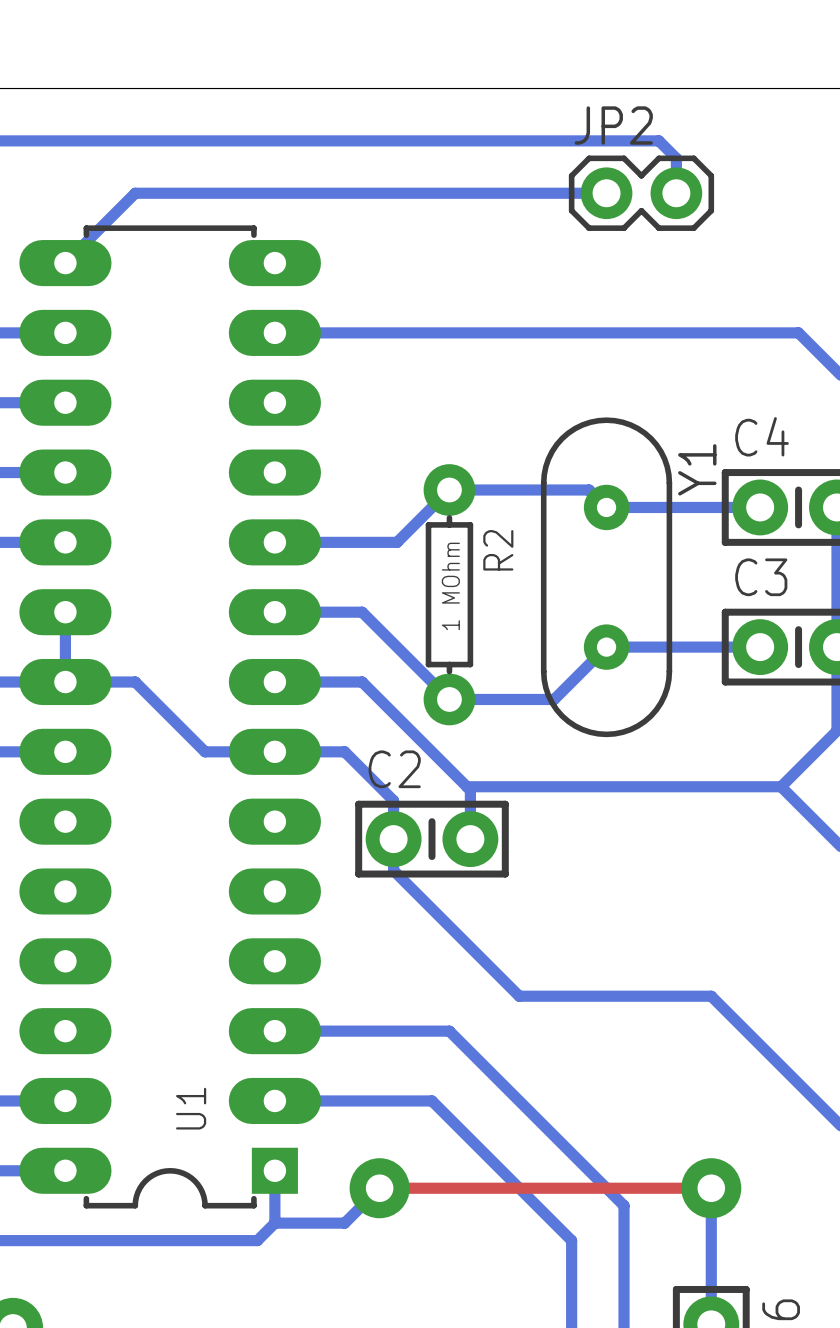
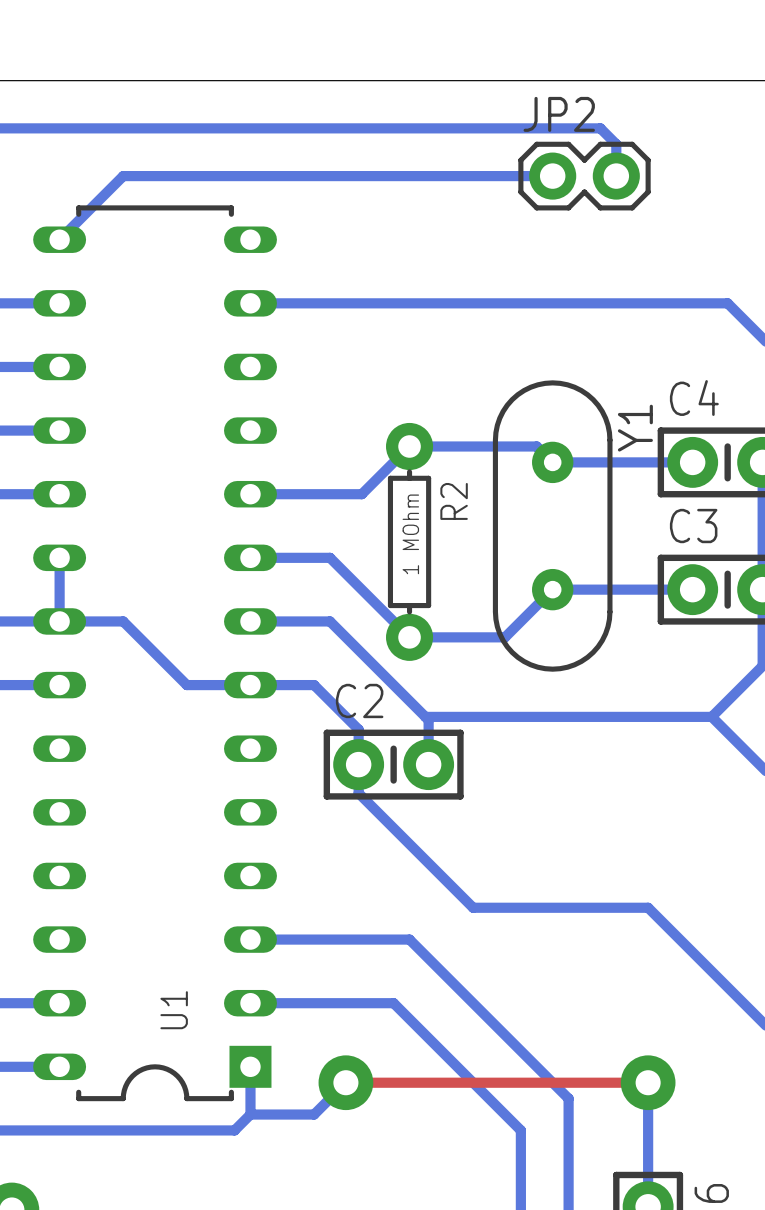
U1 footprint: [19, 225, 321, 1209] -> [33, 205, 277, 1102]

